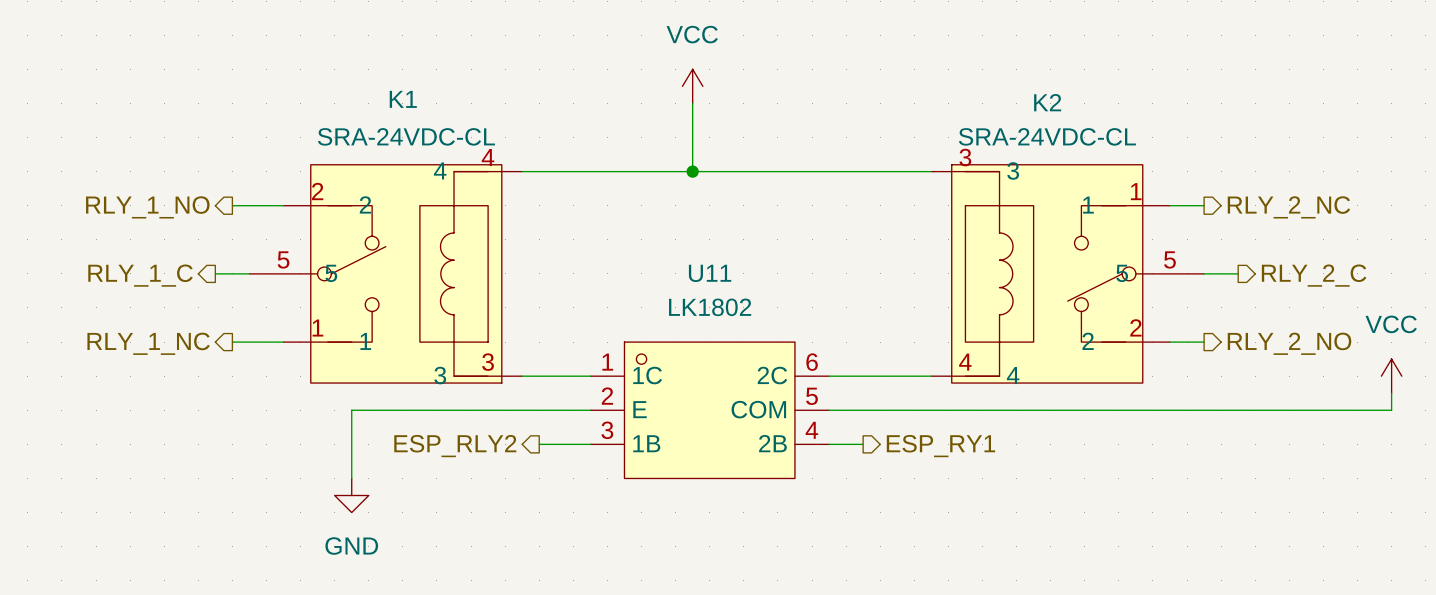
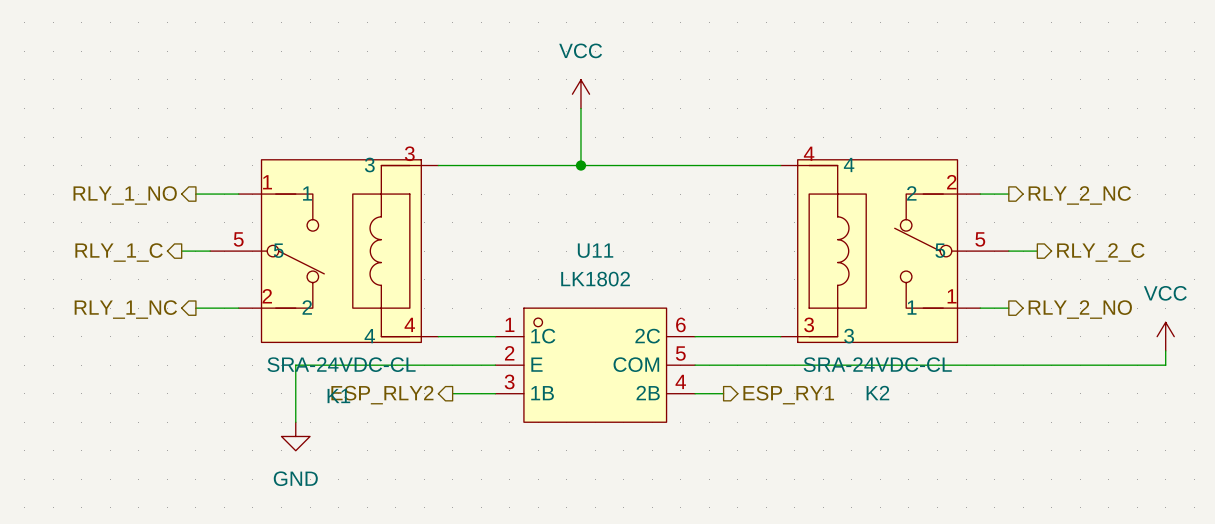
K1 flip: as is (406, 273) -> up-down (341, 251)
K2 flip: as is (1047, 273) -> up-down (877, 251)

